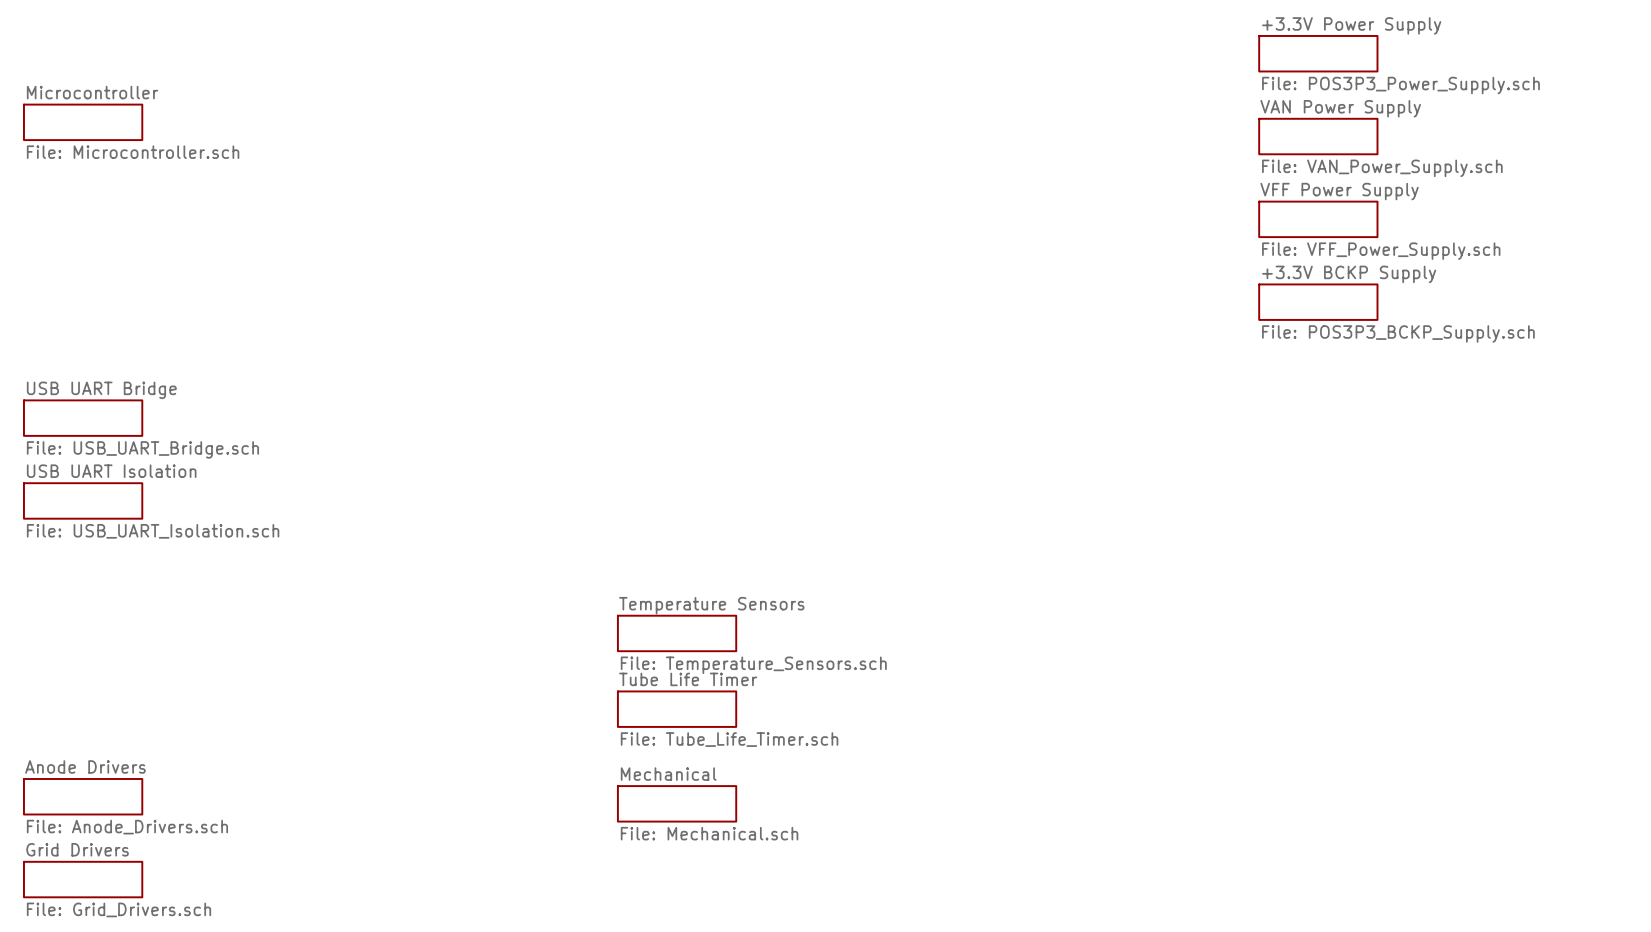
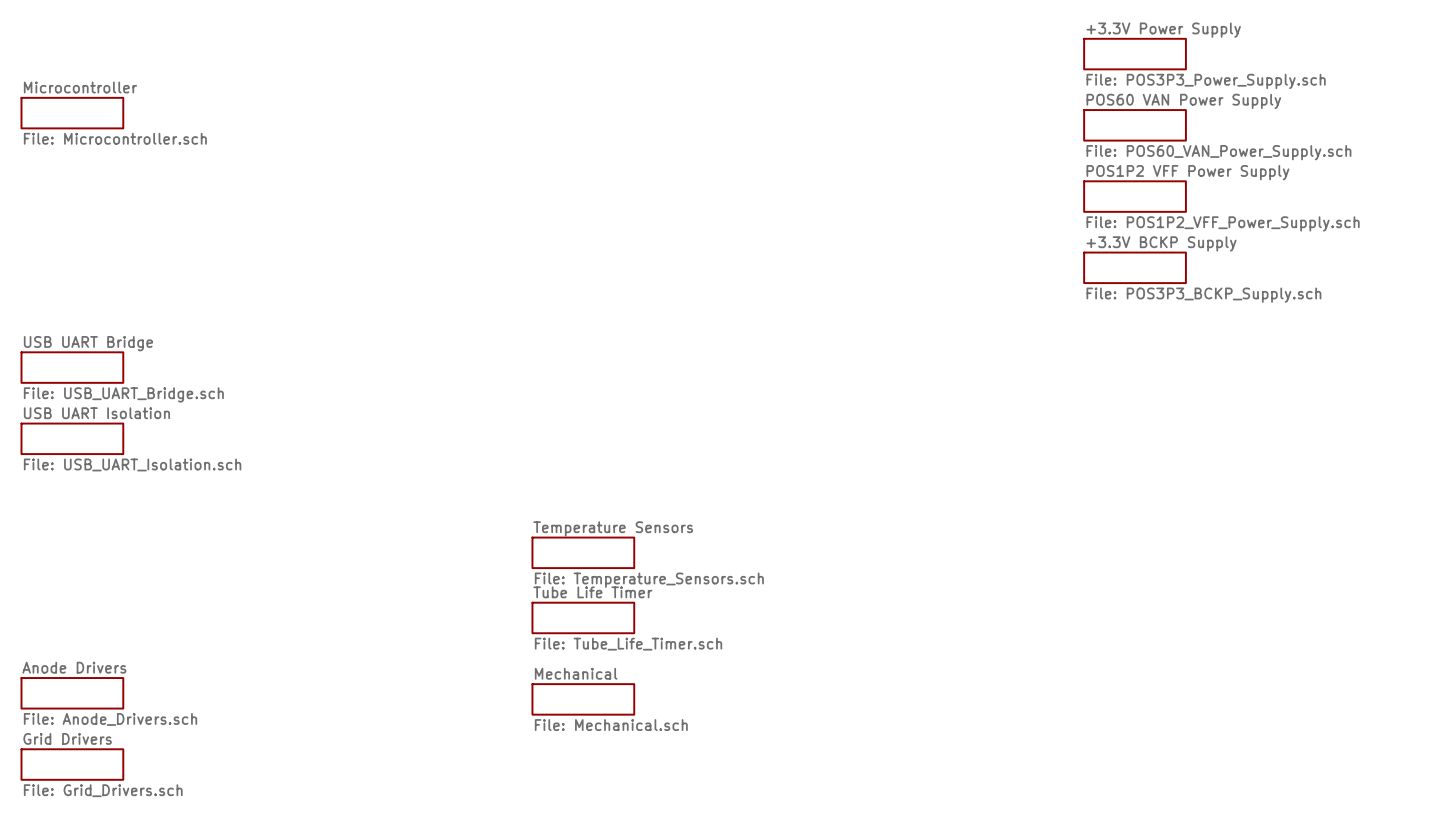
sheet VAN Power Supply name: VAN Power Supply (1340, 108) -> POS60 VAN Power Supply (1183, 101)
sheet VAN Power Supply value: File: VAN_Power_Supply.sch (1382, 168) -> File: POS60_VAN_Power_Supply.sch (1218, 152)
sheet VFF Power Supply name: VFF Power Supply (1339, 191) -> POS1P2 VFF Power Supply (1187, 172)
sheet VFF Power Supply value: File: VFF_Power_Supply.sch (1381, 251) -> File: POS1P2_VFF_Power_Supply.sch (1223, 223)

